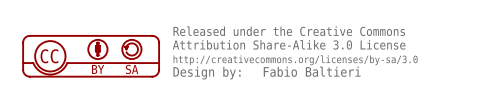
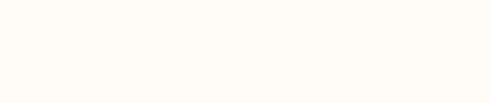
part: Fabio Baltieri (295, 52) -> none
part: (91, 56) -> none

